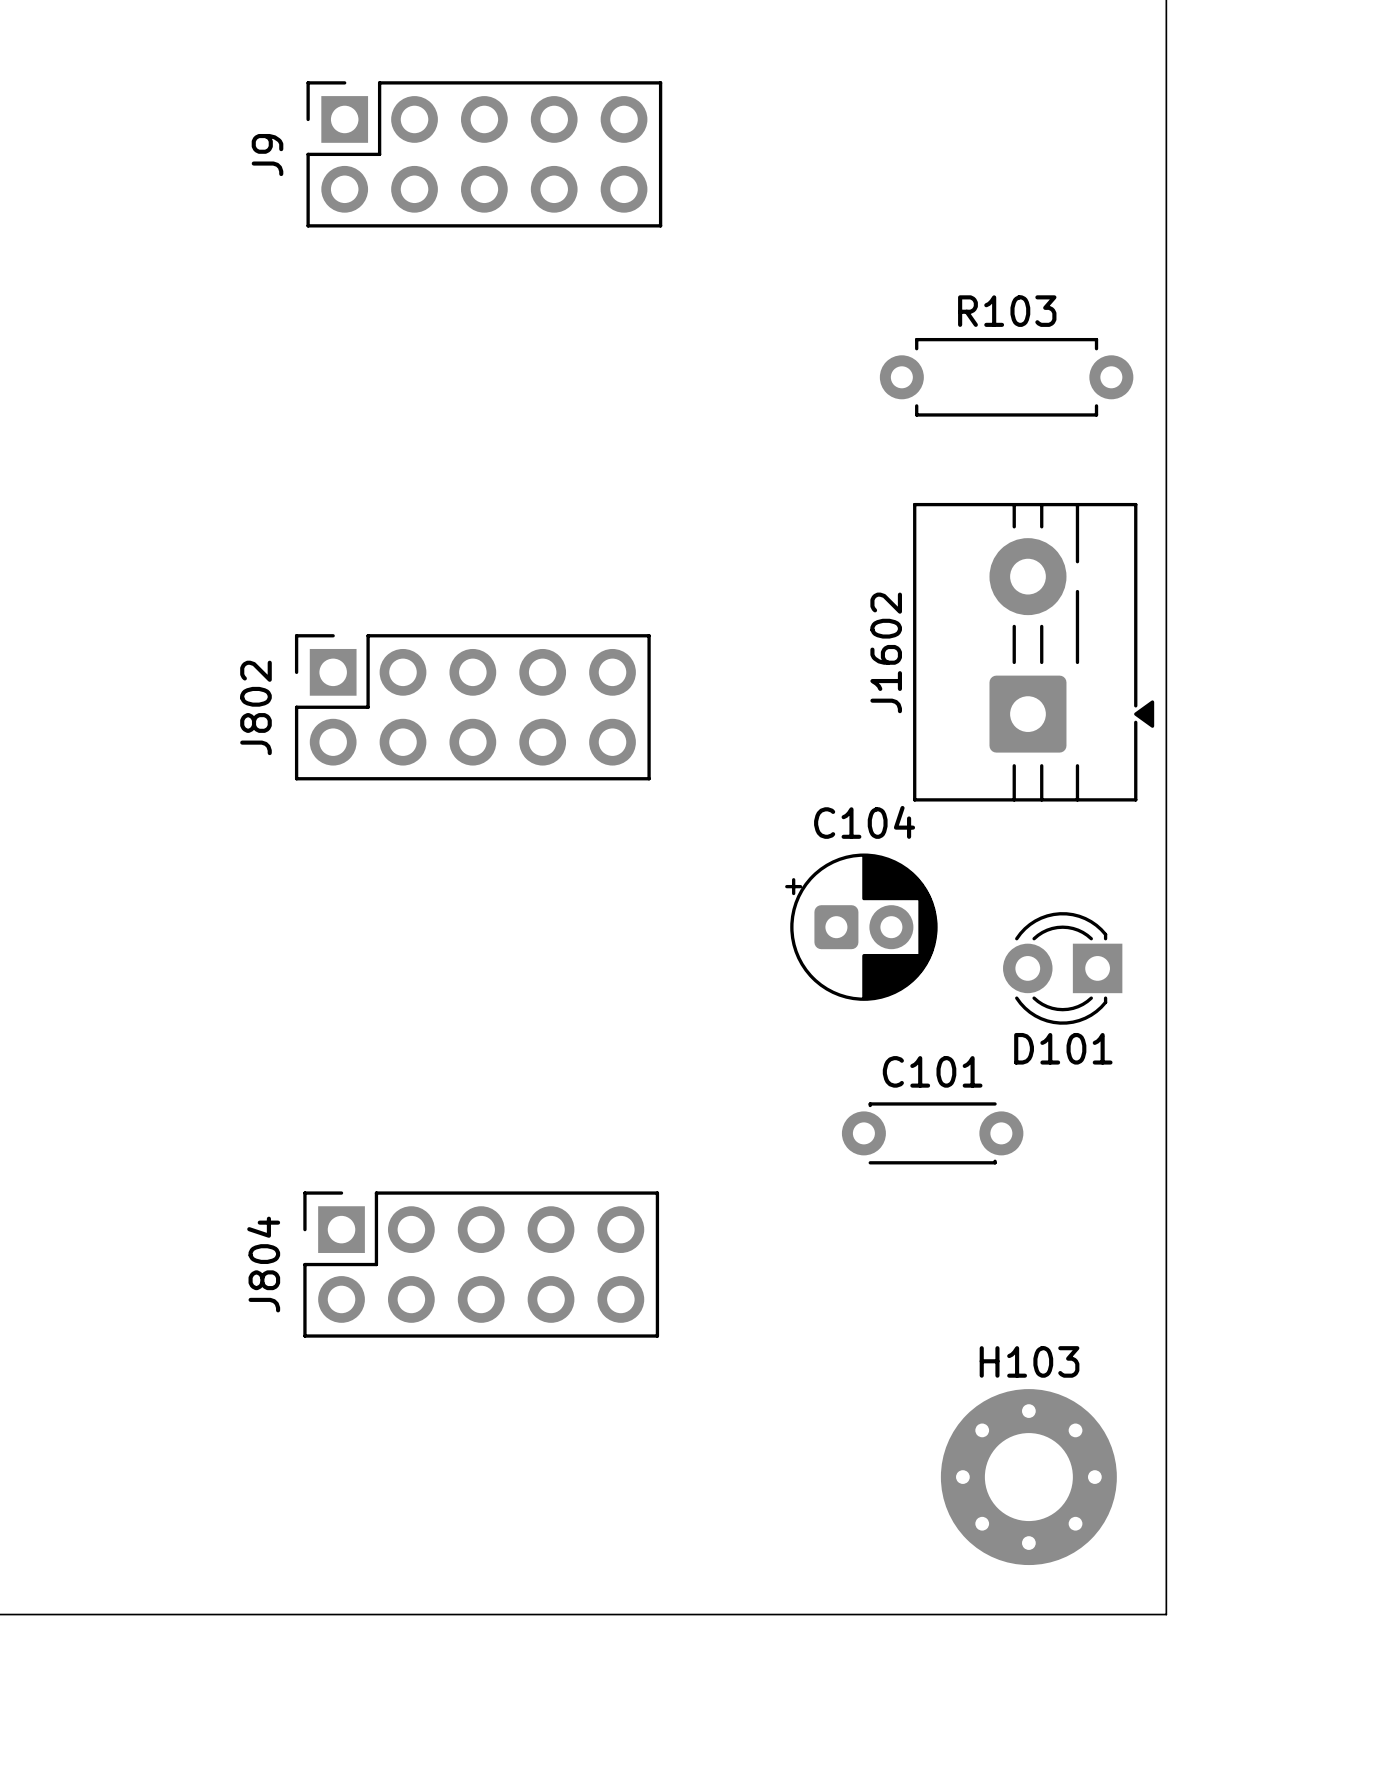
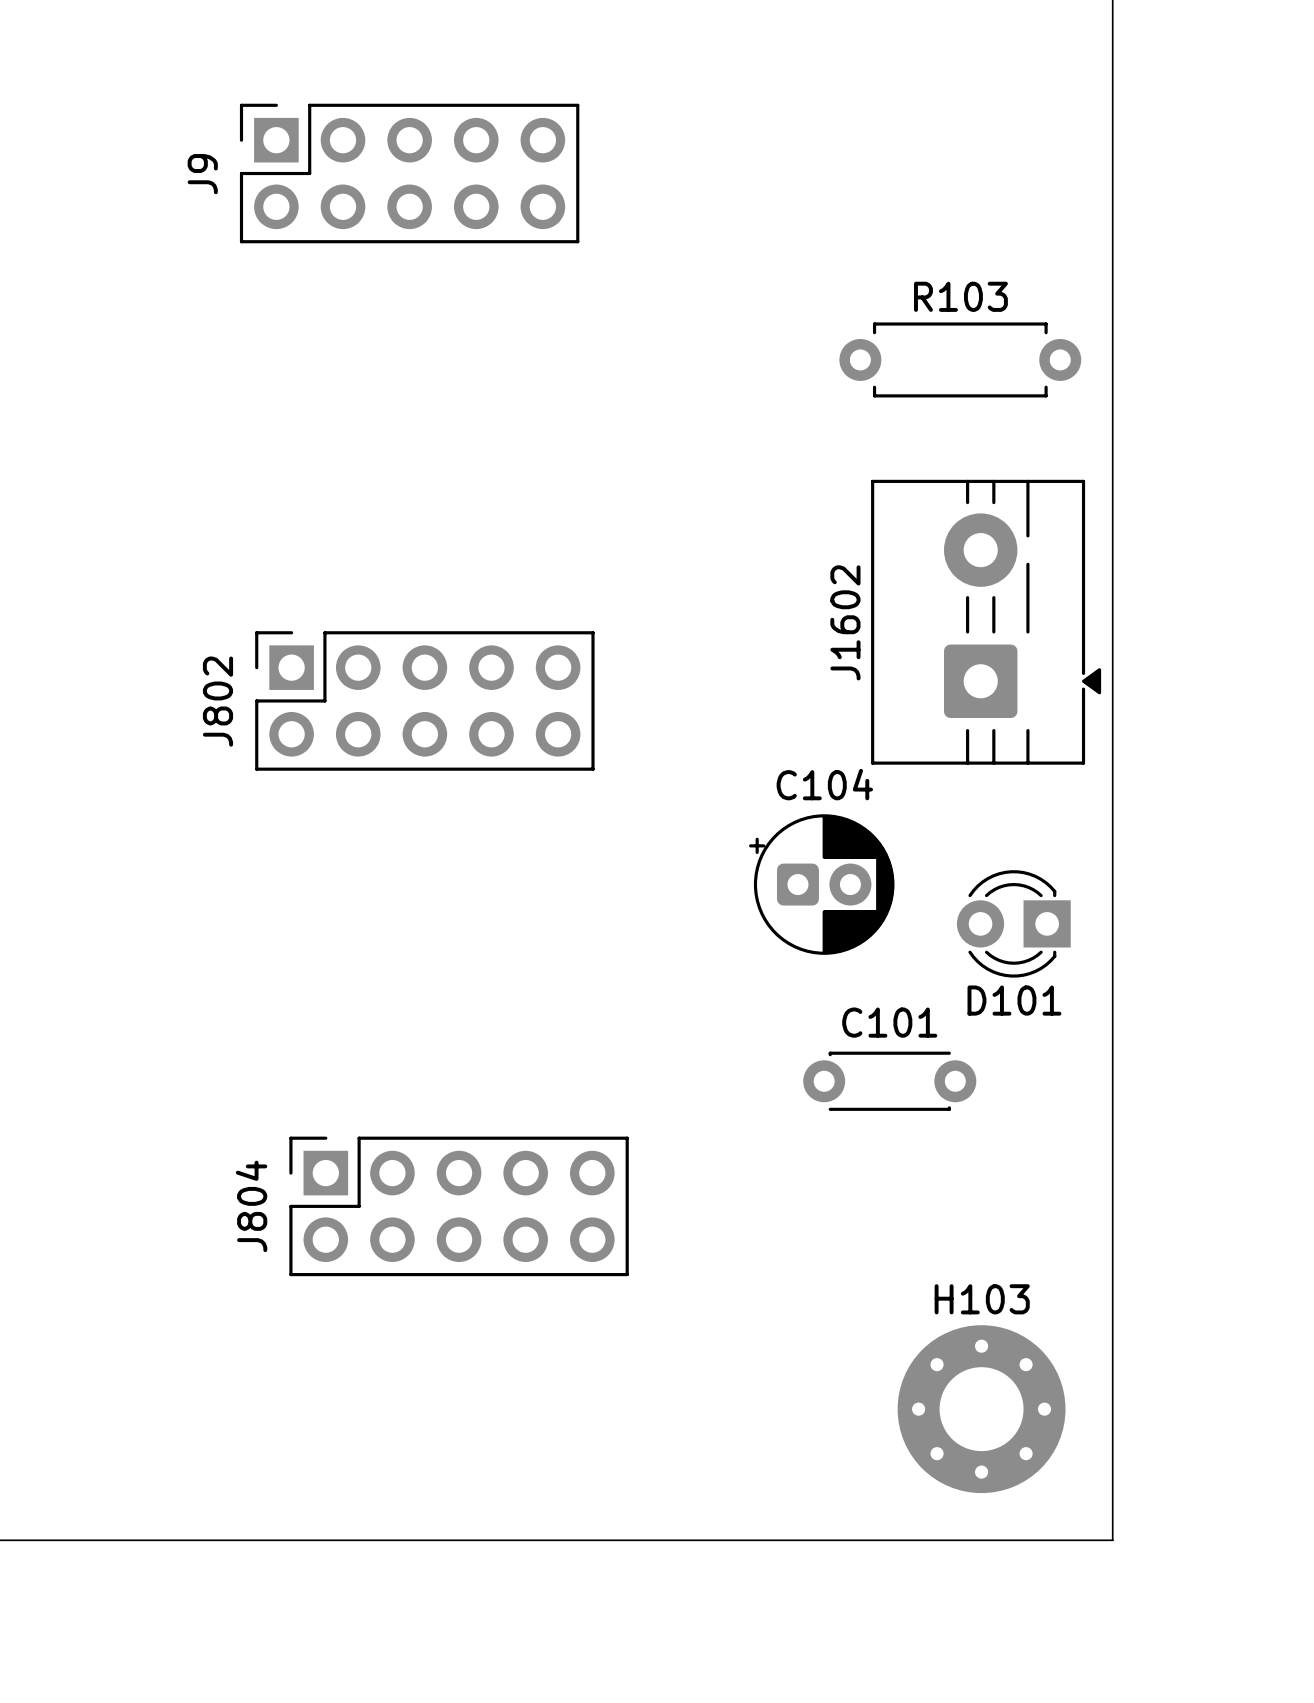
J9 position: (484, 154) -> (409, 173)
J802 position: (472, 707) -> (424, 700)

